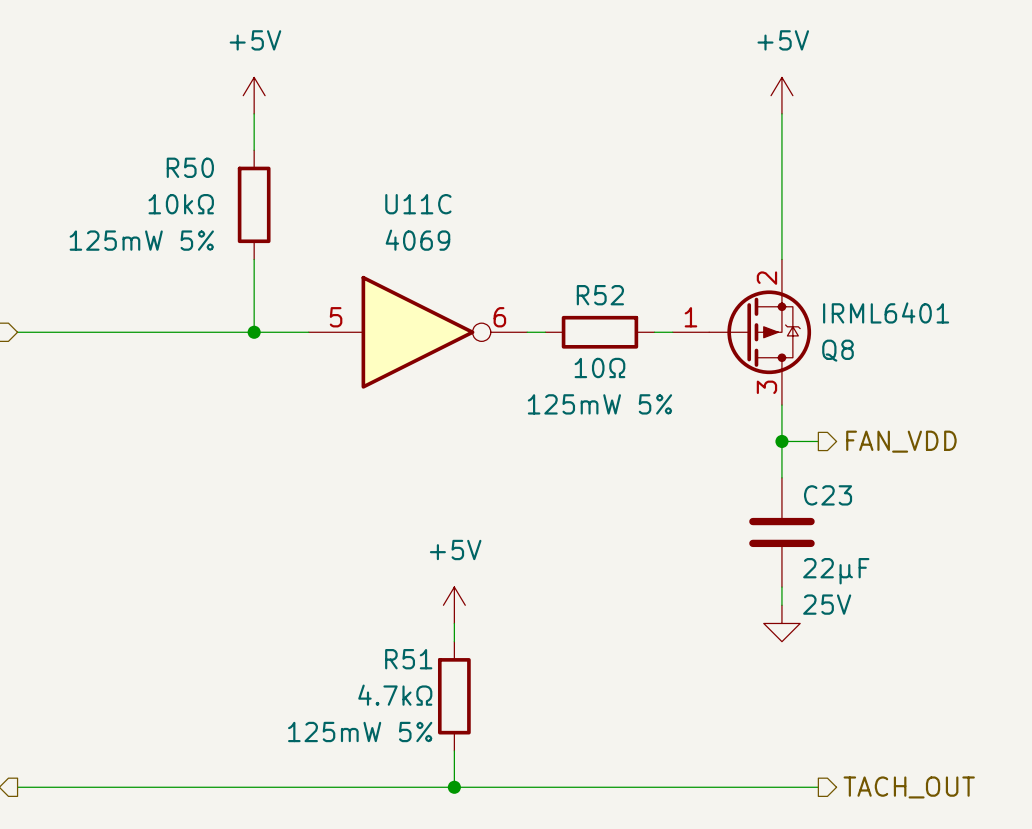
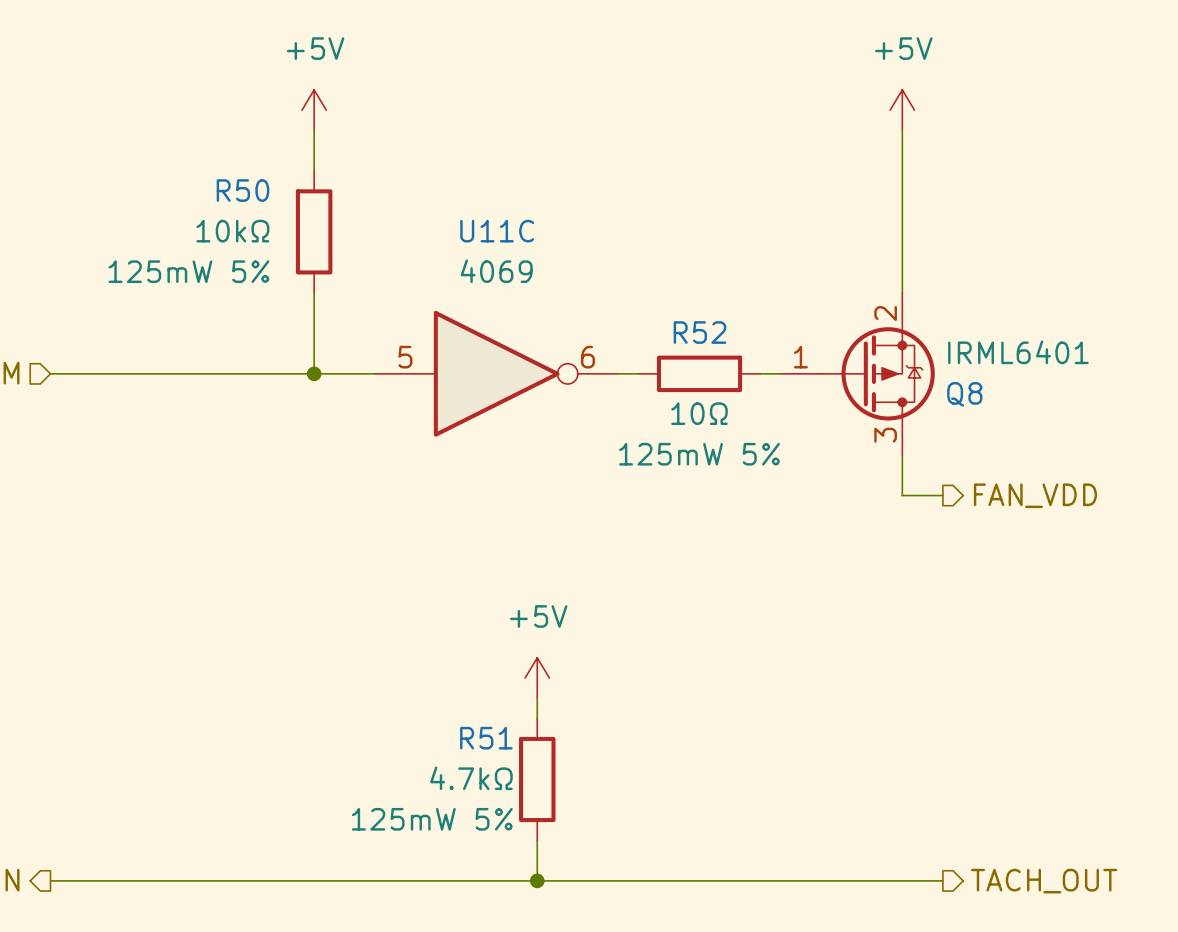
wire: (781, 441) (781, 477) -> none
junction: (781, 441) -> none
C23: 22μF (781, 532) -> none
wire: (781, 587) (781, 605) -> none
power symbol: (781, 623) -> none

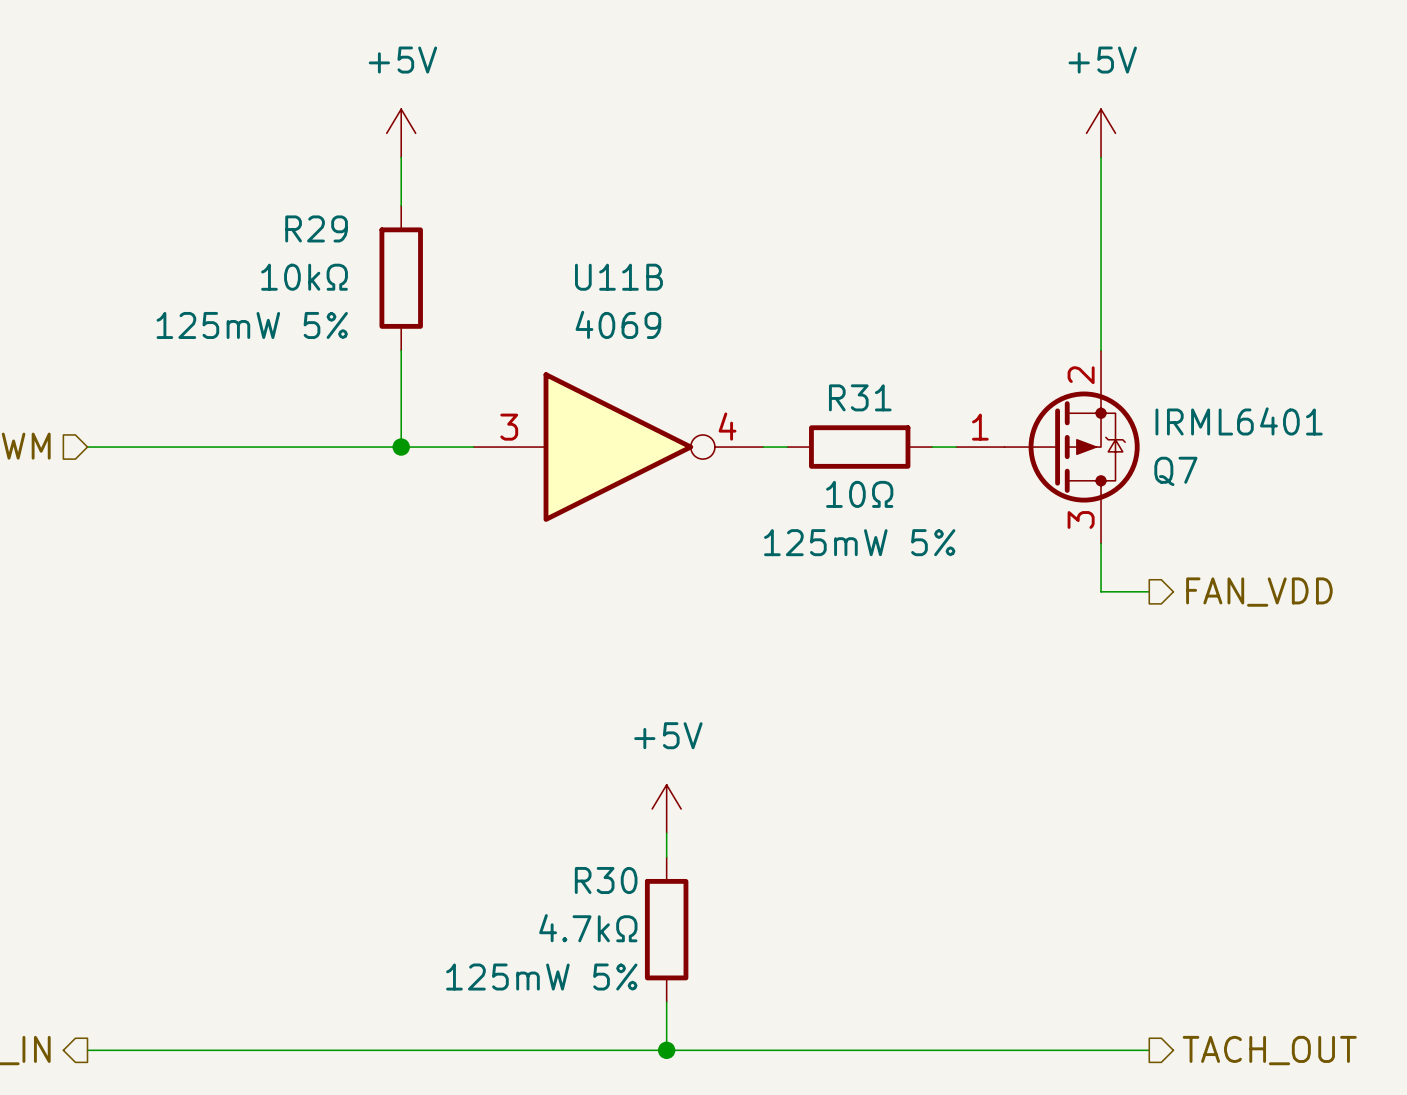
R50 name: R50 (243, 190) -> R29 (316, 228)
U11C name: U11C (497, 231) -> U11B (618, 277)
R52 name: R52 (700, 332) -> R31 (860, 397)
U11C pin number: 5 (405, 357) -> 3 (509, 427)
U11C pin number: 6 (587, 357) -> 4 (727, 426)
Q8 name: Q8 (964, 394) -> Q7 (1175, 471)
R51 name: R51 (486, 738) -> R30 (606, 880)

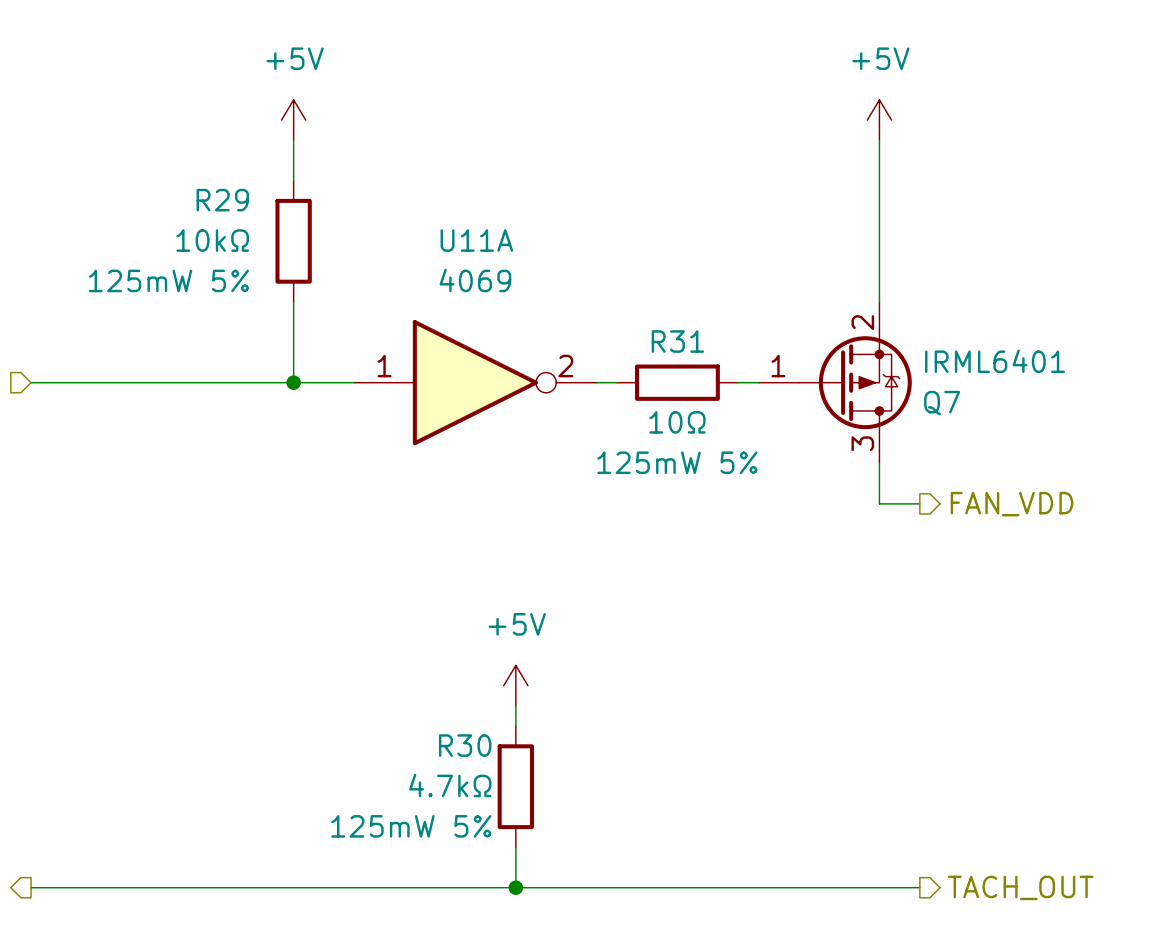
U11B name: U11B (618, 277) -> U11A (476, 240)
U11B pin number: 4 (727, 426) -> 2 (565, 366)
U11B pin number: 3 (509, 427) -> 1 (384, 366)

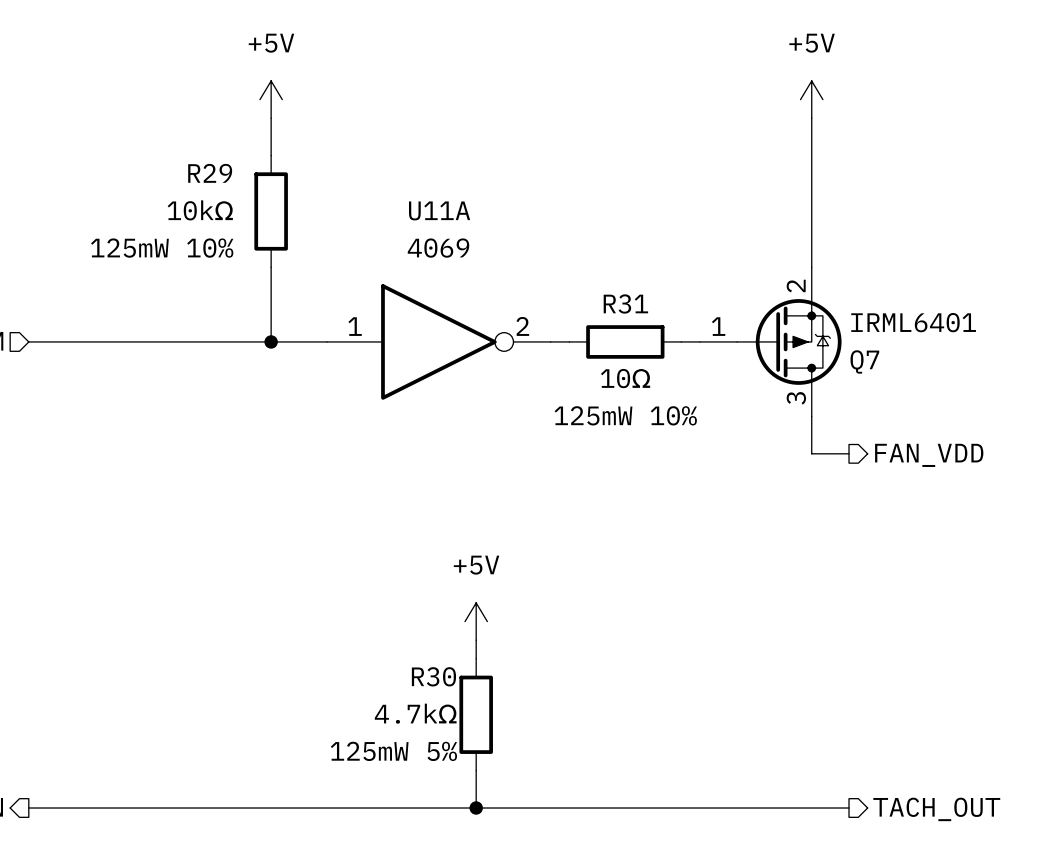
R29 text: 125mW 5% (168, 280) -> 125mW 10% (162, 248)
R31 text: 125mW 5% (677, 462) -> 125mW 10% (625, 415)

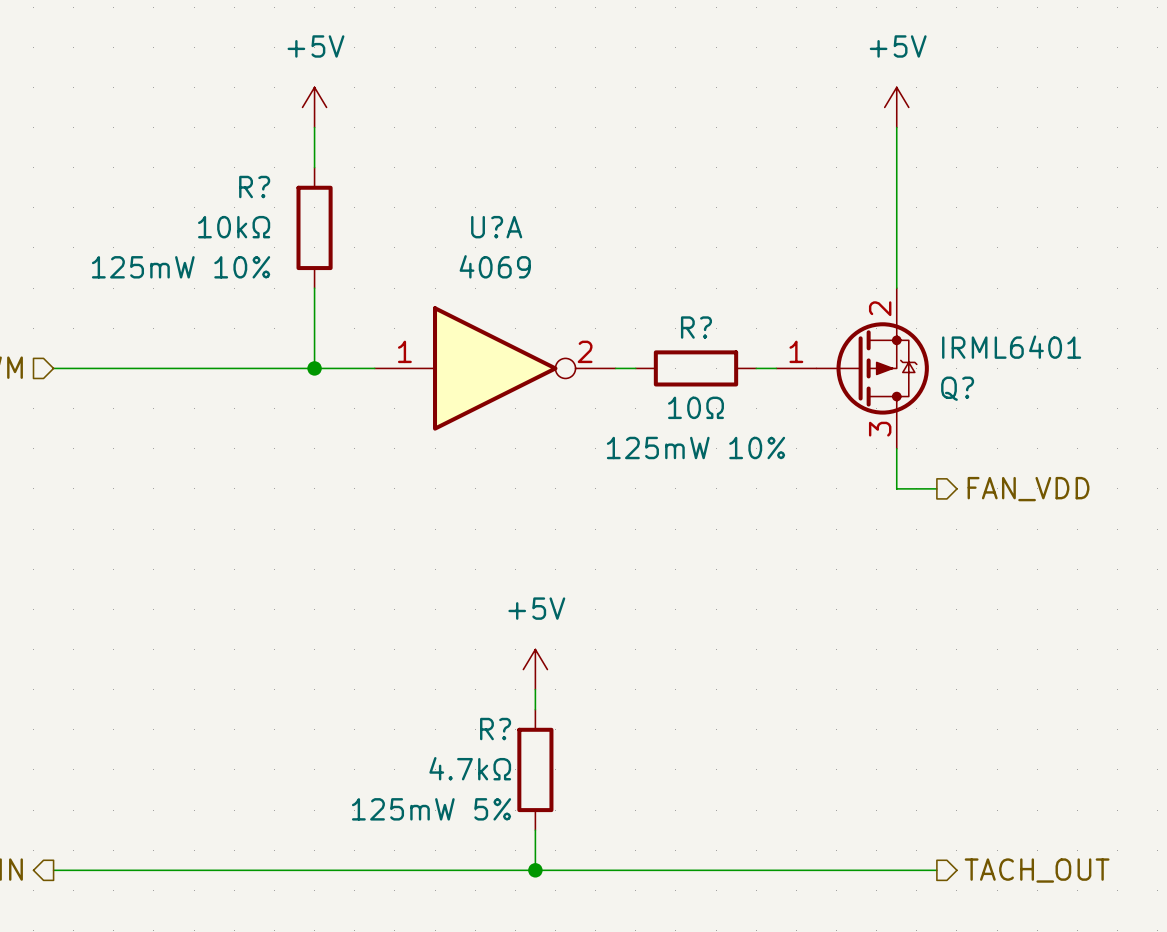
R29 name: R29 (210, 173) -> R? (254, 187)
U11A name: U11A (439, 210) -> U?A (496, 227)
R31 name: R31 (625, 303) -> R? (696, 327)
Q7 name: Q7 (864, 361) -> Q? (957, 388)
R30 name: R30 (433, 676) -> R? (495, 729)

